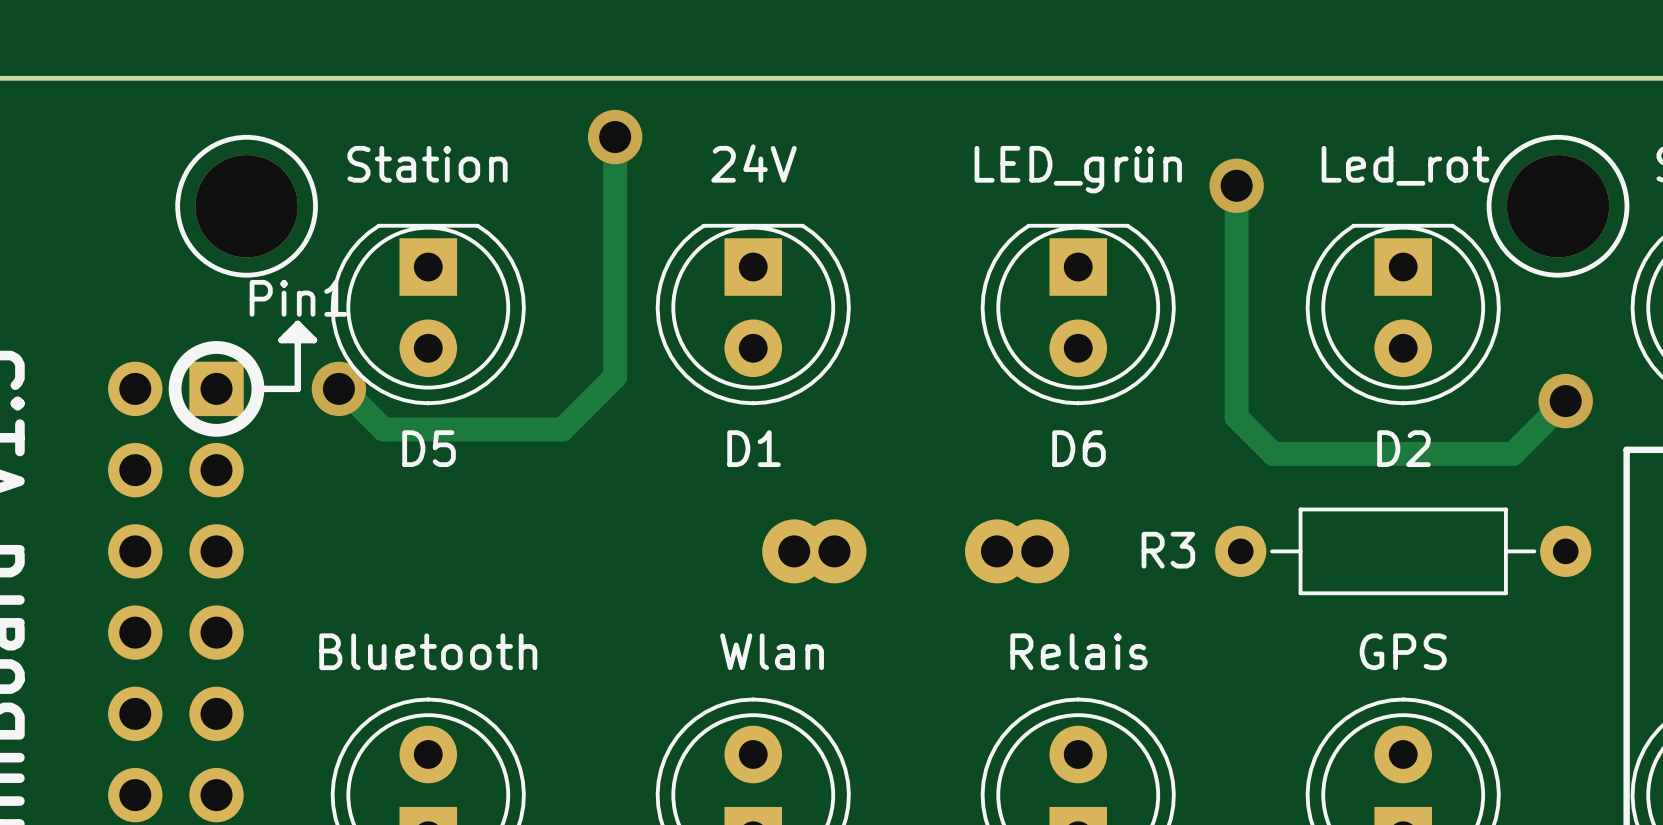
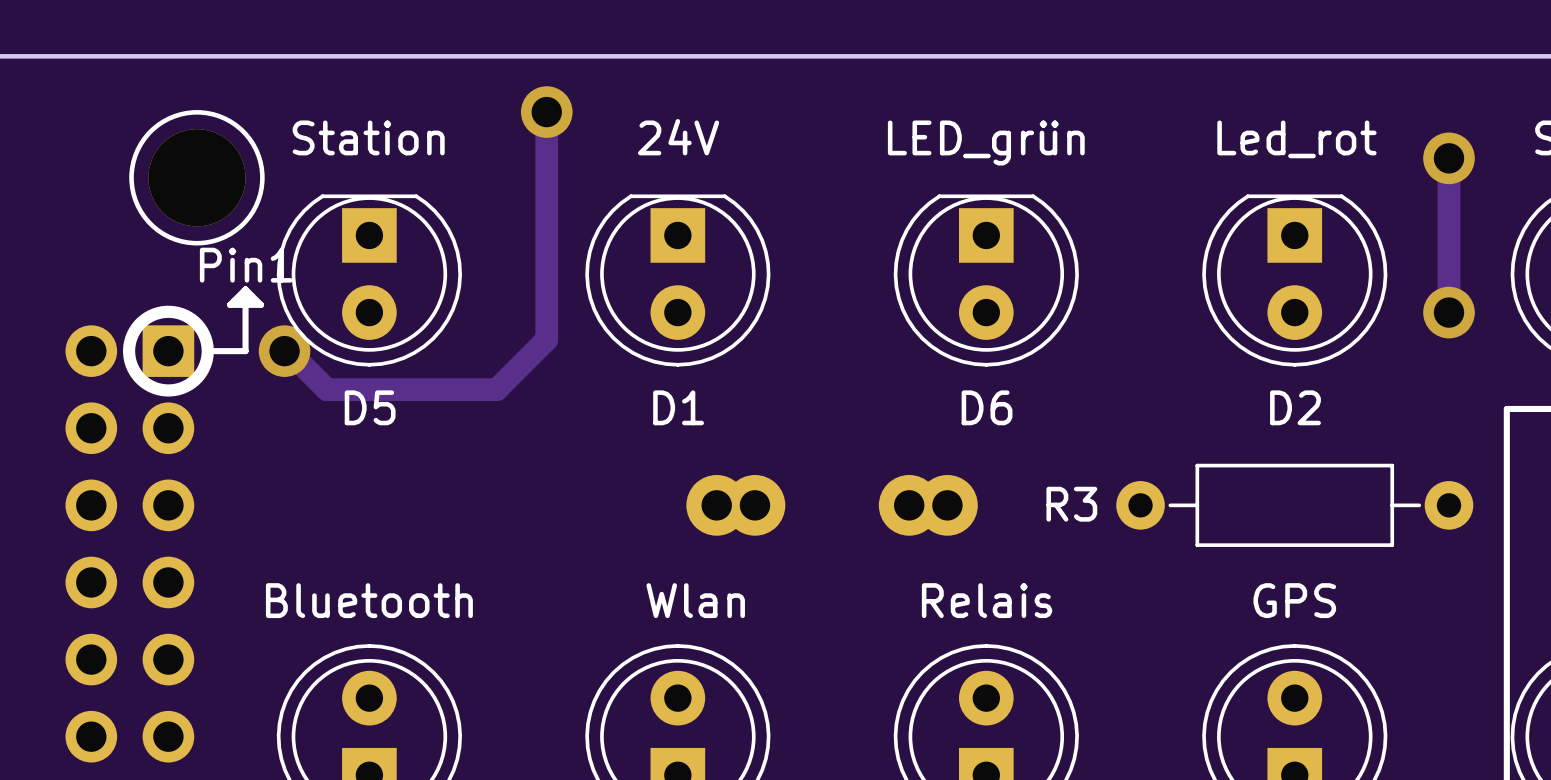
track: (1236, 185) (1236, 417) (1273, 453) (1512, 453) (1565, 401) -> none
via: (1236, 185) -> none
track: none -> (1449, 158) (1449, 312)
via: none -> (1449, 158)
part: (1558, 206) -> none
via position: (1565, 401) -> (1449, 312)

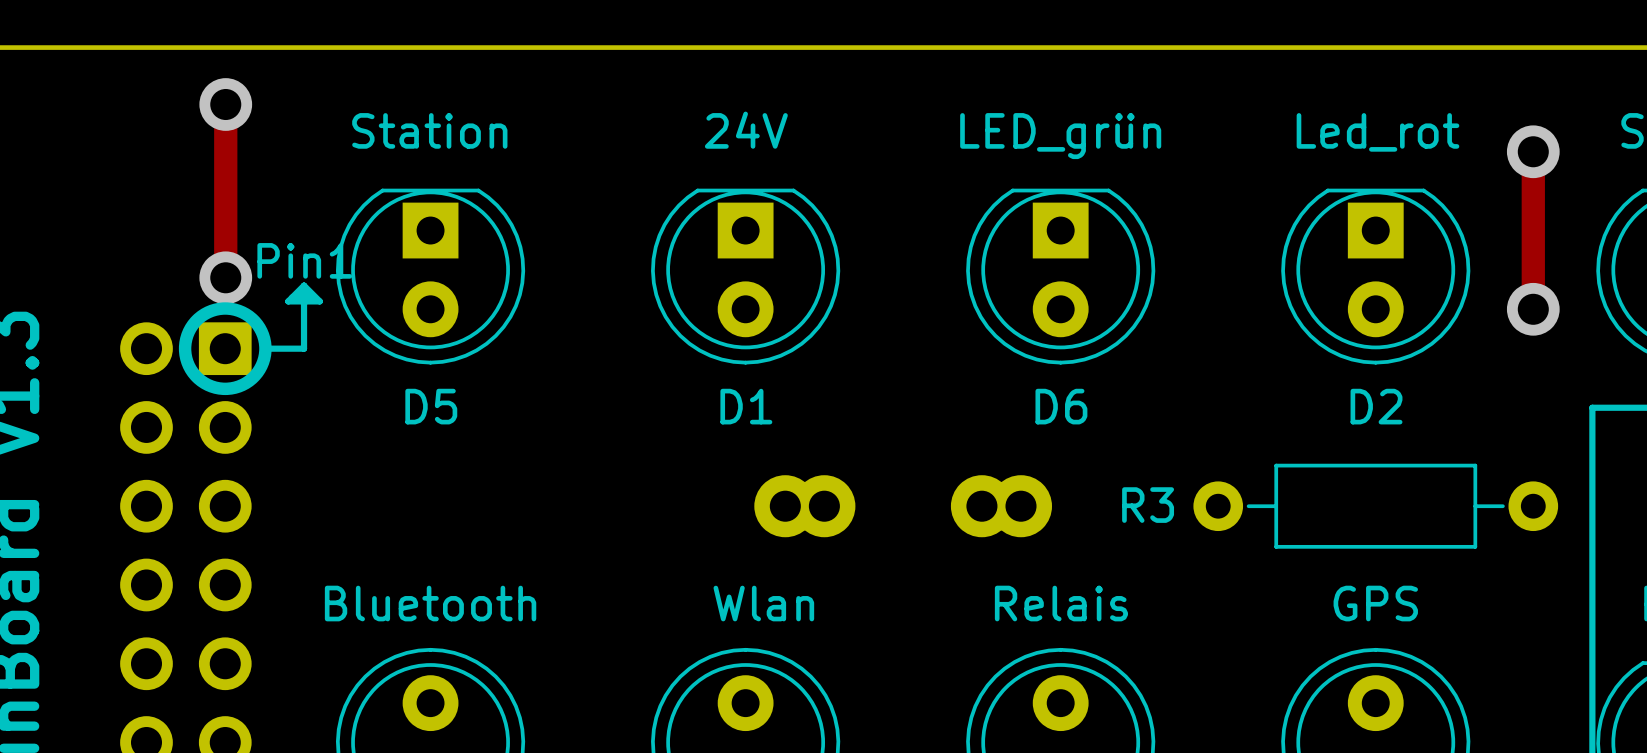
track: none -> (225, 104) (225, 277)
via: none -> (225, 104)
track: (546, 112) (546, 339) (496, 389) (326, 389) (288, 351) (284, 351) -> none
via: (546, 112) -> none
part: (196, 177) -> none
via: none -> (225, 277)
via: (284, 351) -> none

